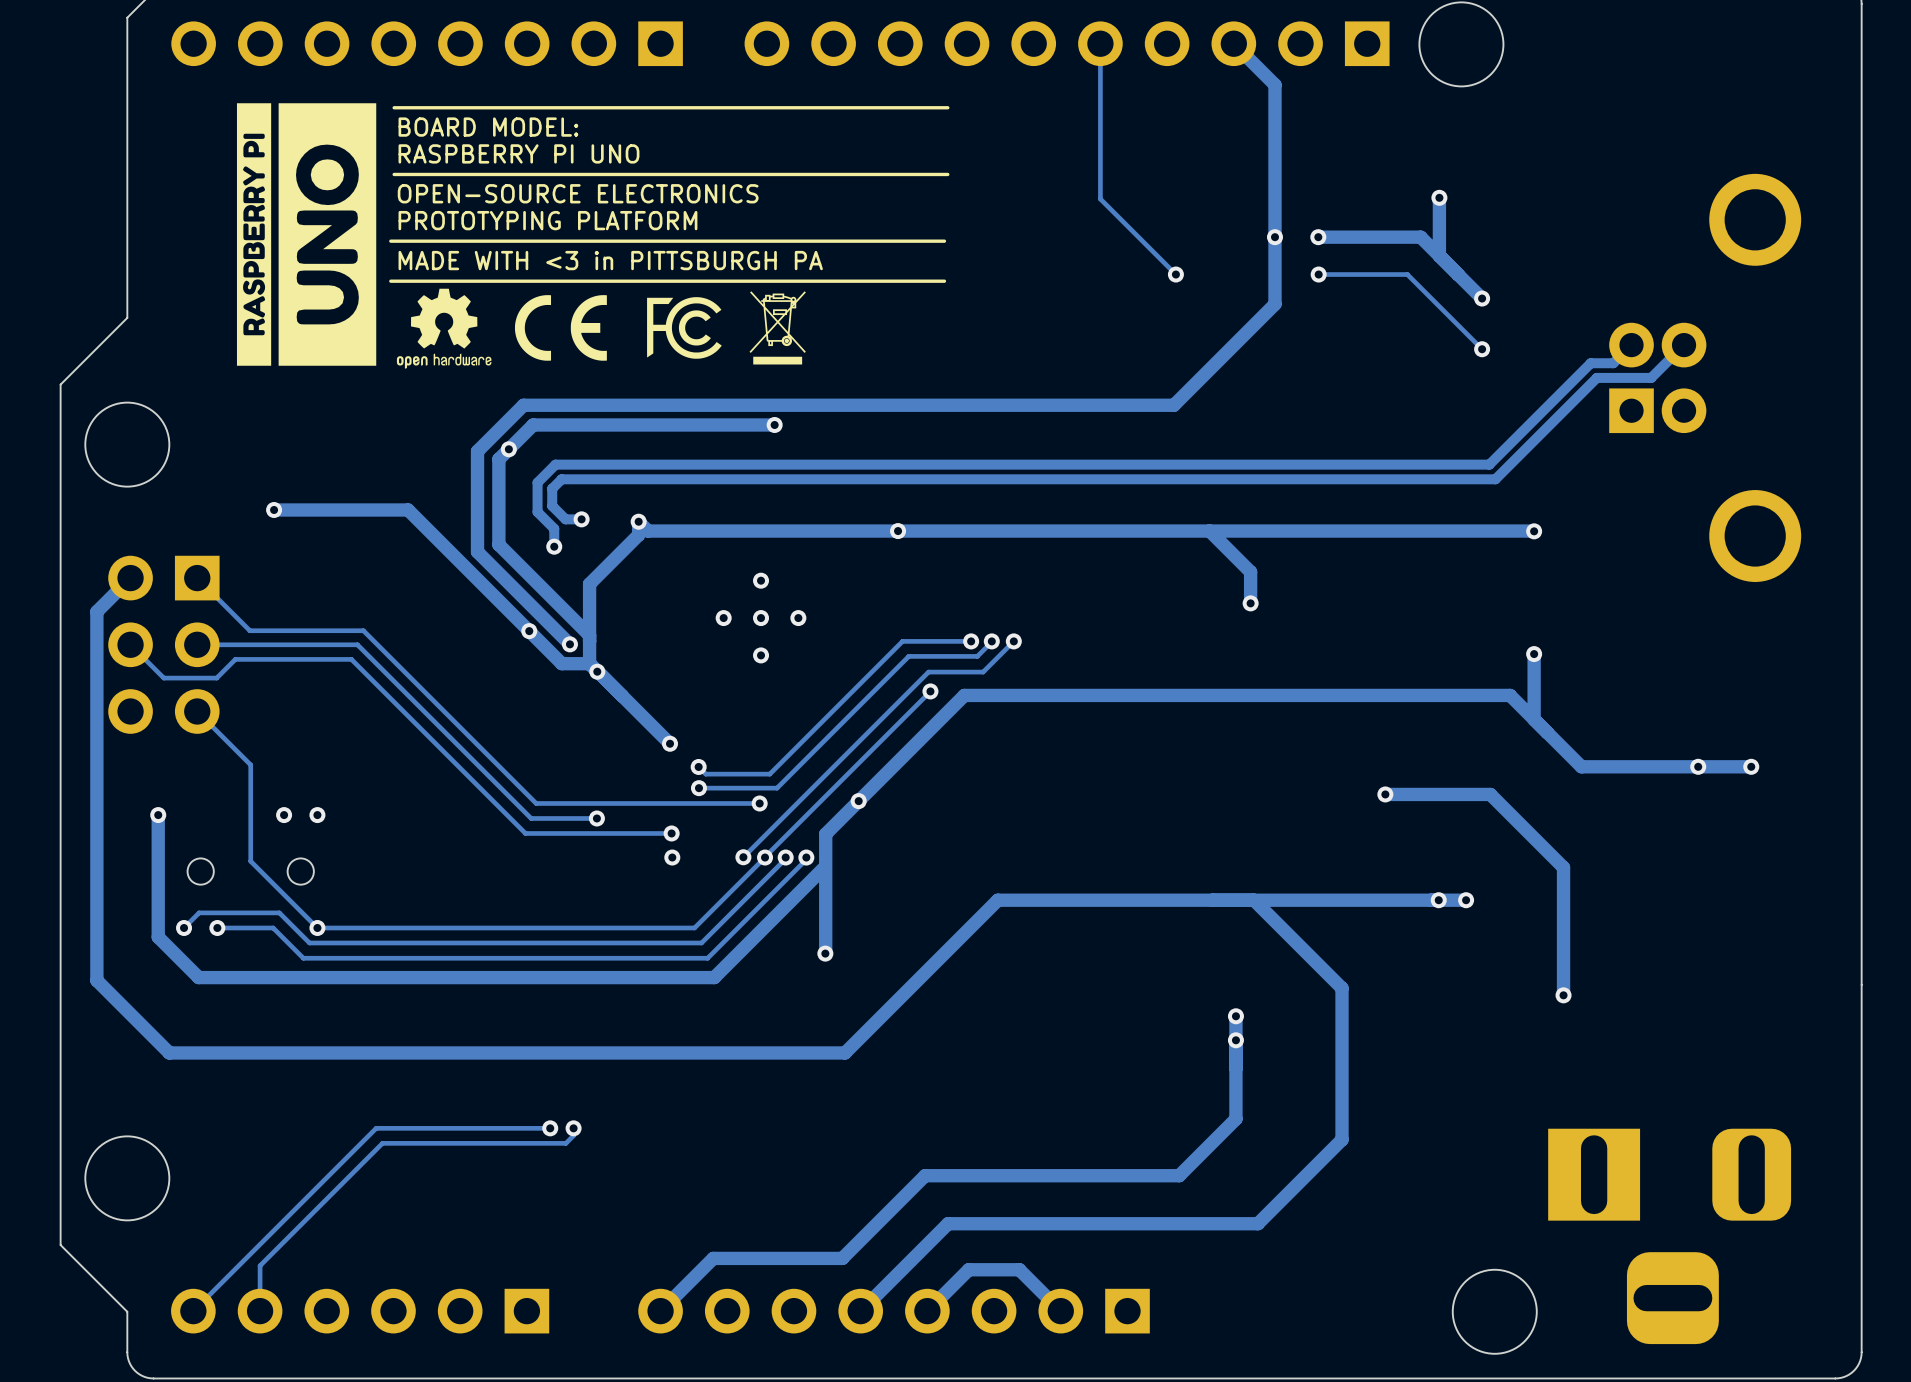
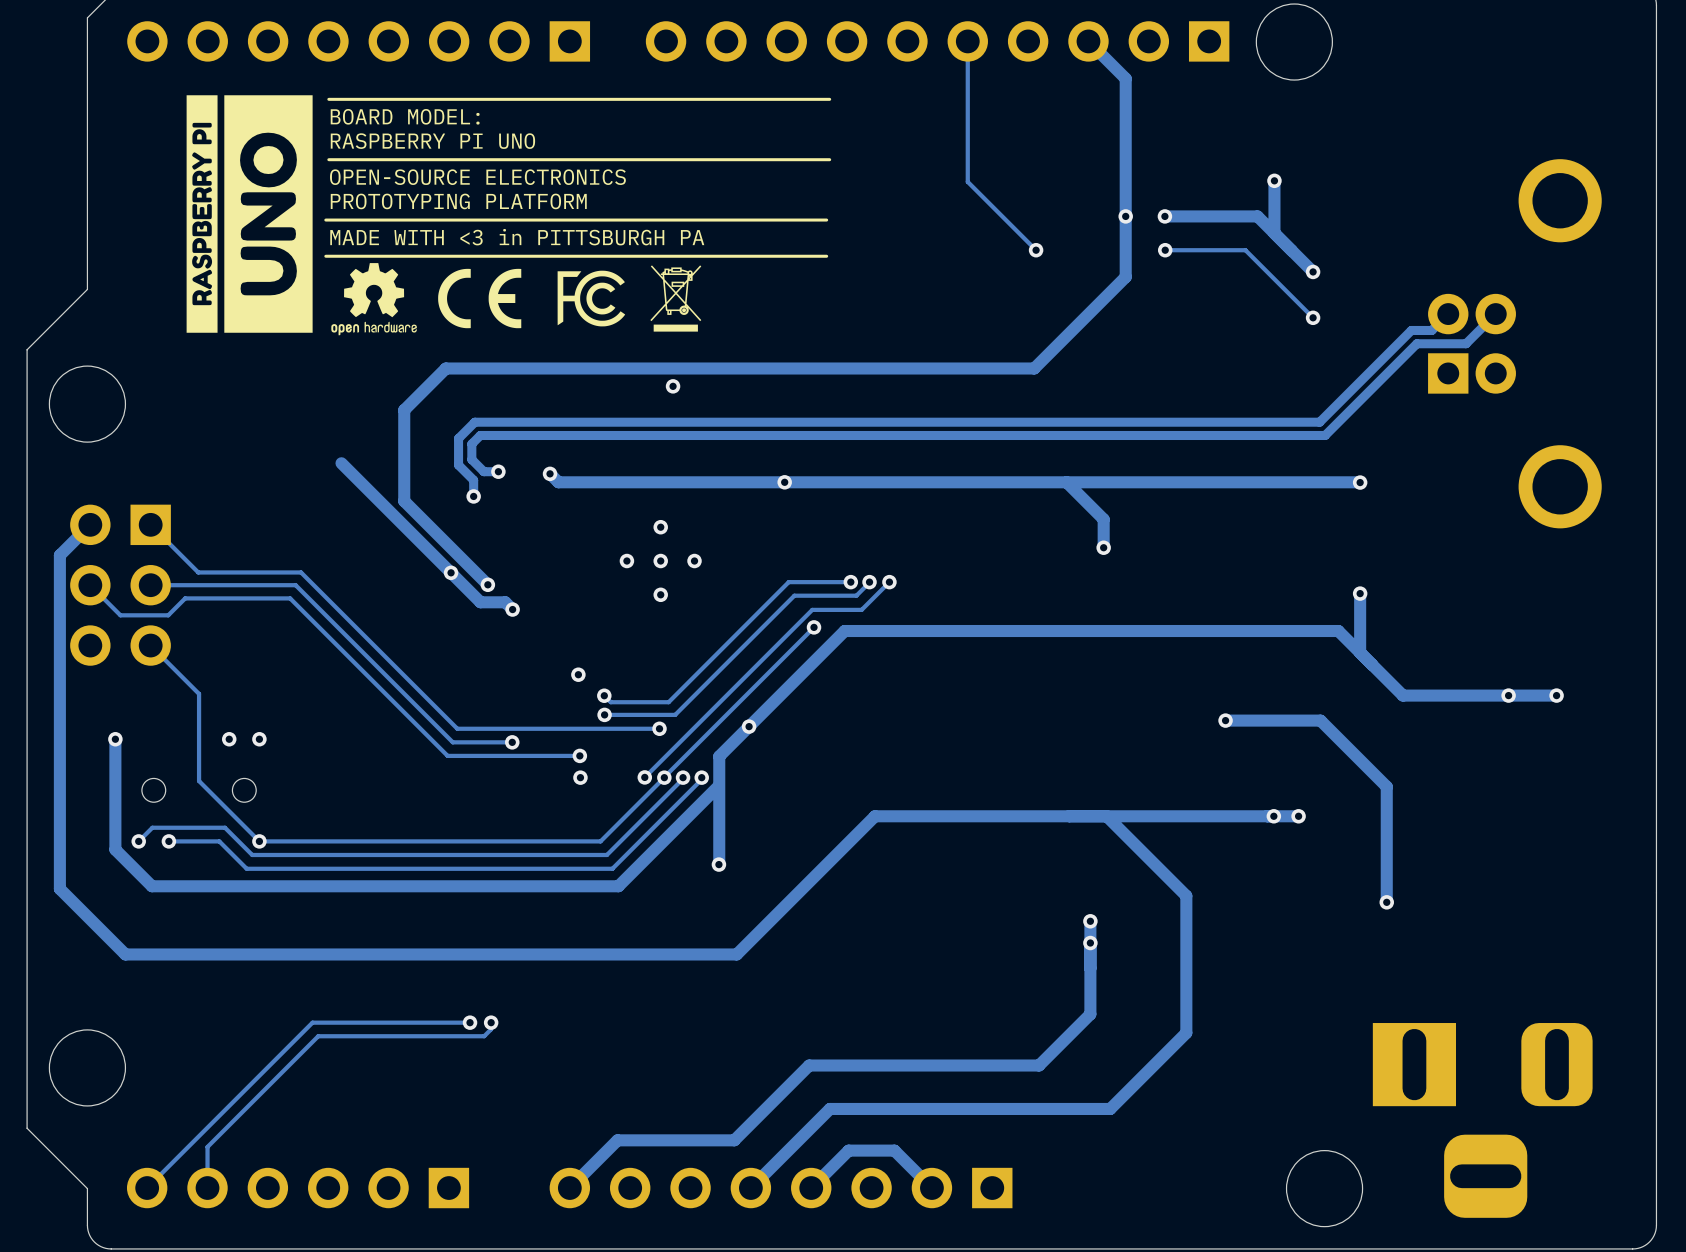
track: (774, 424) (533, 424) (498, 459) (498, 544) (589, 635) -> none
via: (508, 449) -> none
via: (274, 509) -> none
track: (408, 509) (274, 509) -> none
track: (638, 521) (638, 534) (589, 584) (589, 663) (670, 743) -> none

